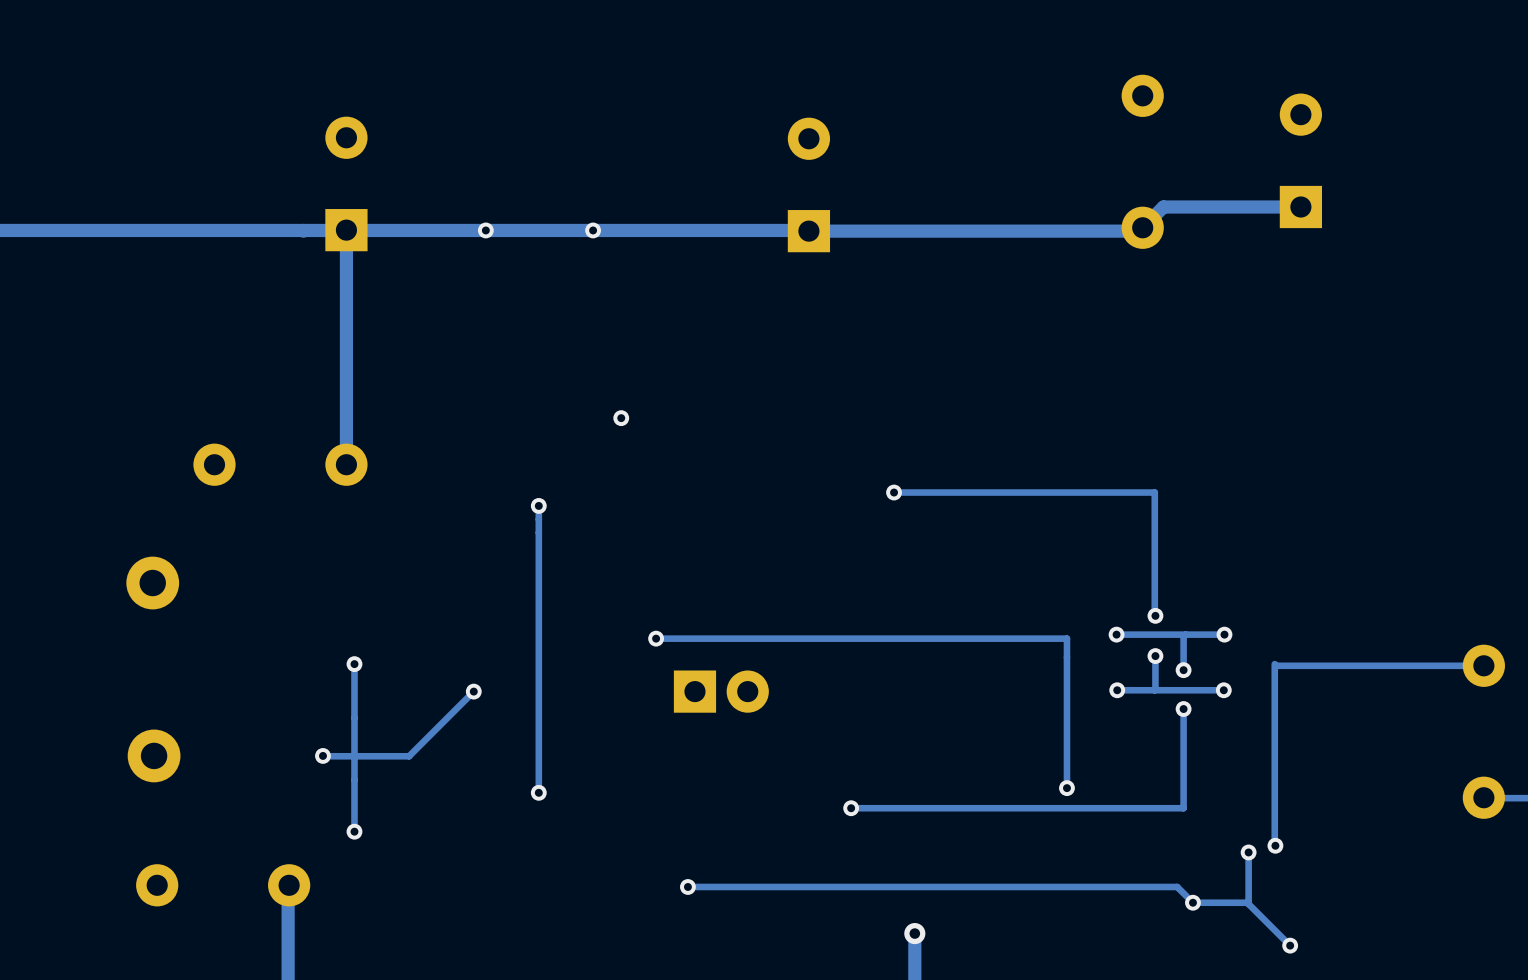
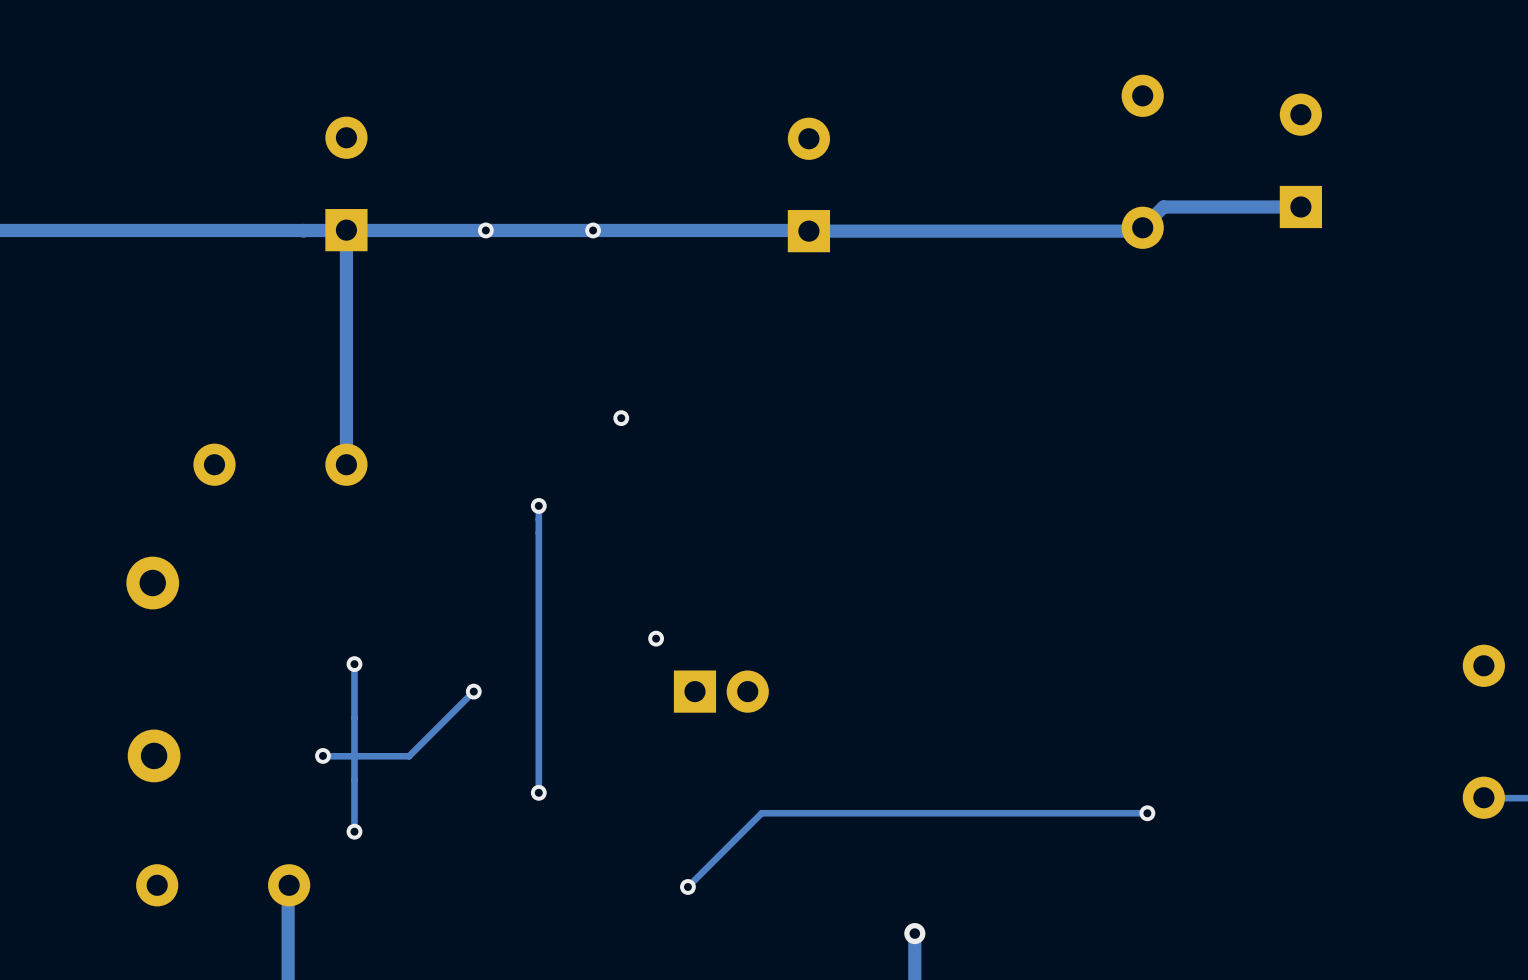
track: (894, 492) (1154, 492) (1155, 615) -> none
via: (894, 492) -> none
via: (1155, 615) -> none
via: (1116, 634) -> none
track: (1185, 634) (1183, 636) (1183, 670) -> none
track: (1224, 634) (1116, 634) -> none
via: (1224, 634) -> none
track: (656, 638) (1066, 638) (1066, 788) -> none
track: (1155, 656) (1154, 690) -> none
via: (1155, 656) -> none
track: (1274, 664) (1275, 845) -> none
track: (1483, 665) (1276, 665) -> none
via: (1183, 670) -> none
via: (1117, 690) -> none
track: (1223, 690) (1117, 690) -> none
via: (1223, 690) -> none
track: (1183, 709) (1183, 808) (851, 808) -> none
via: (1183, 709) -> none
via: (1066, 788) -> none
via: (851, 808) -> none
via: none -> (1147, 813)
via: (1275, 845) -> none
track: (1248, 852) (1248, 904) (1290, 945) -> none
via: (1248, 852) -> none
track: (687, 886) (1177, 886) (1192, 902) (1248, 902) -> (687, 886) (761, 813) (1147, 813)
via: (1192, 902) -> none
via: (1290, 945) -> none

